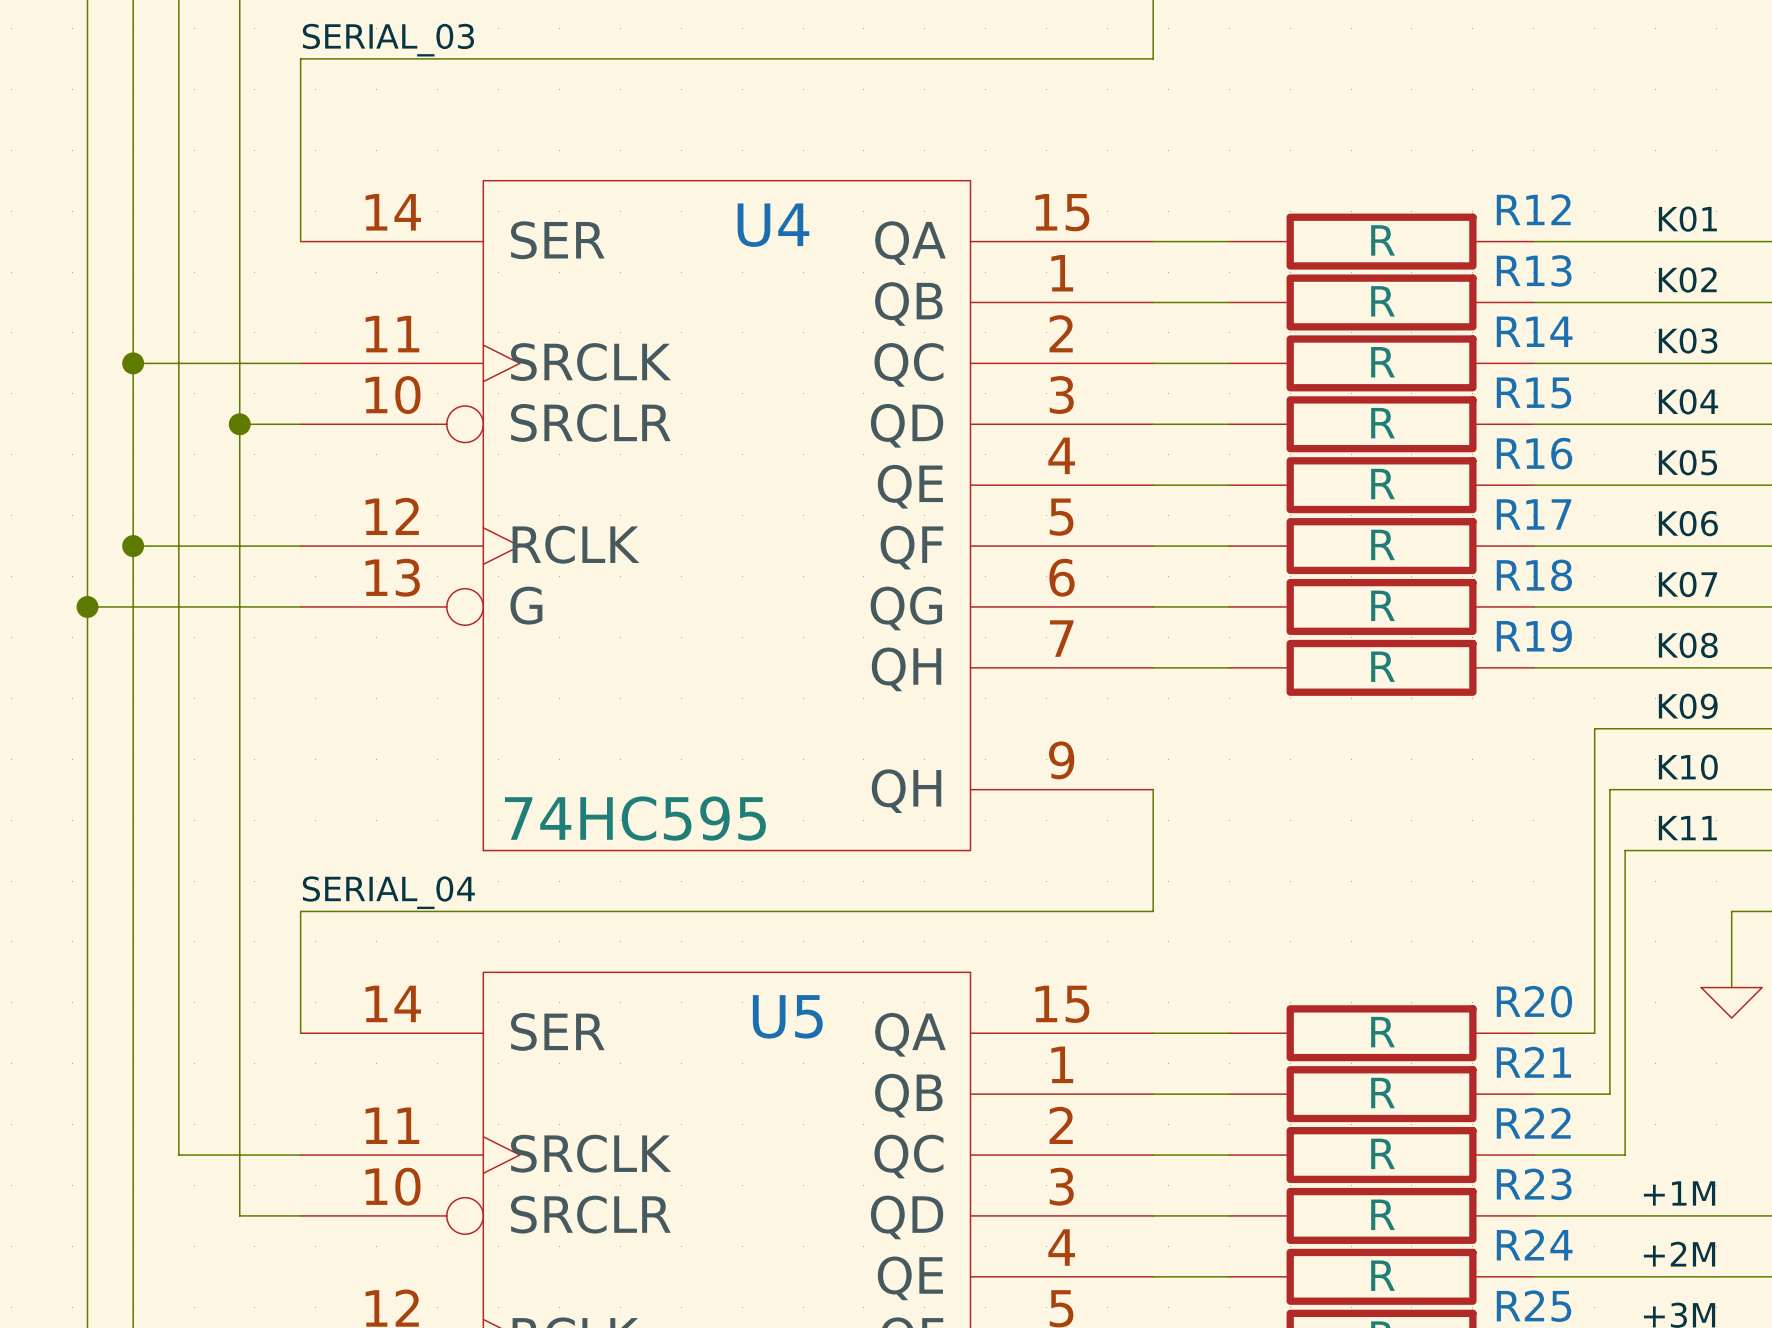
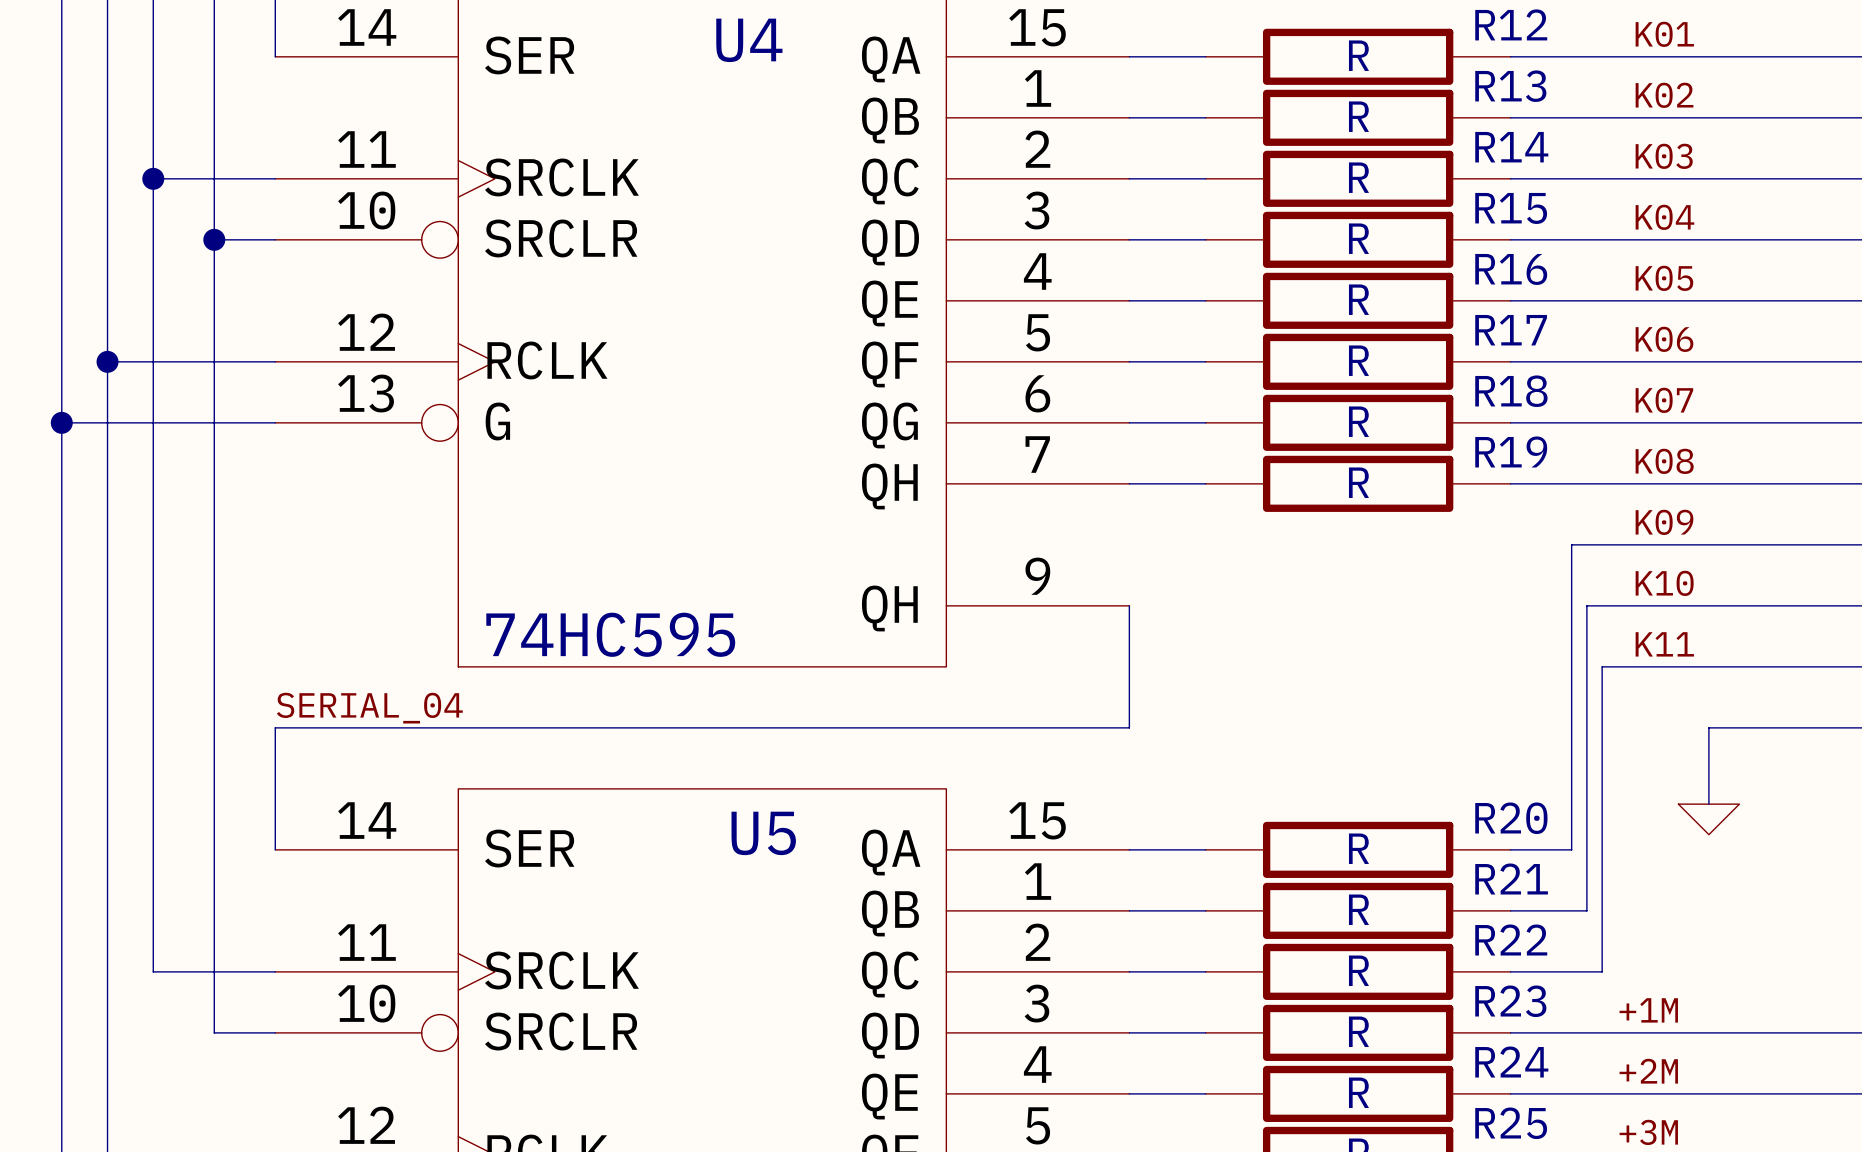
wire: (133, 363) (178, 363) -> none
junction position: (133, 363) -> (153, 178)

